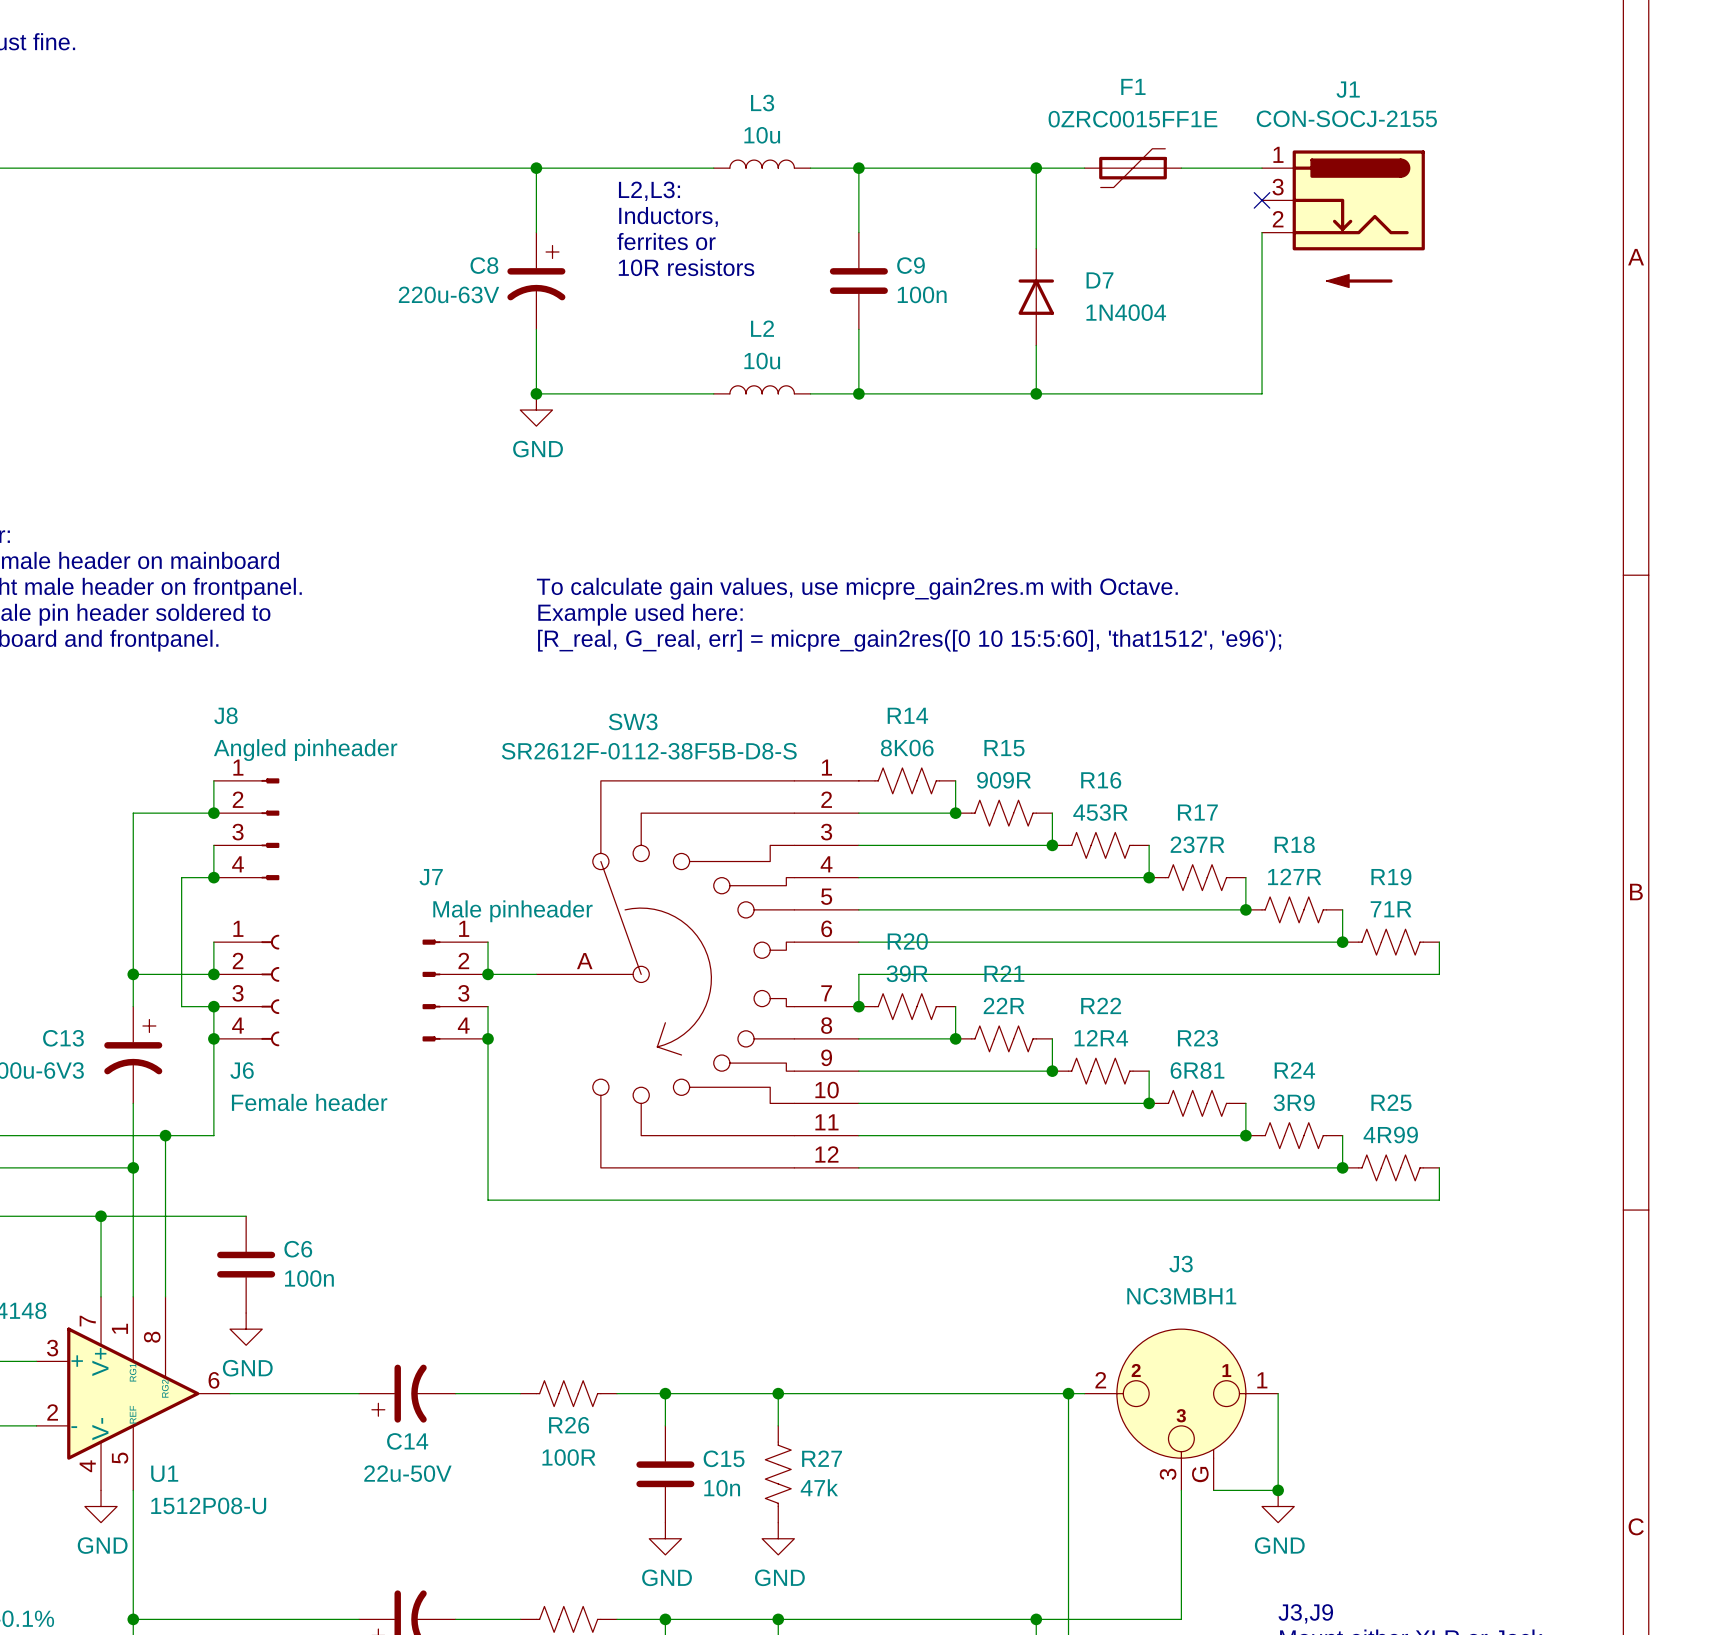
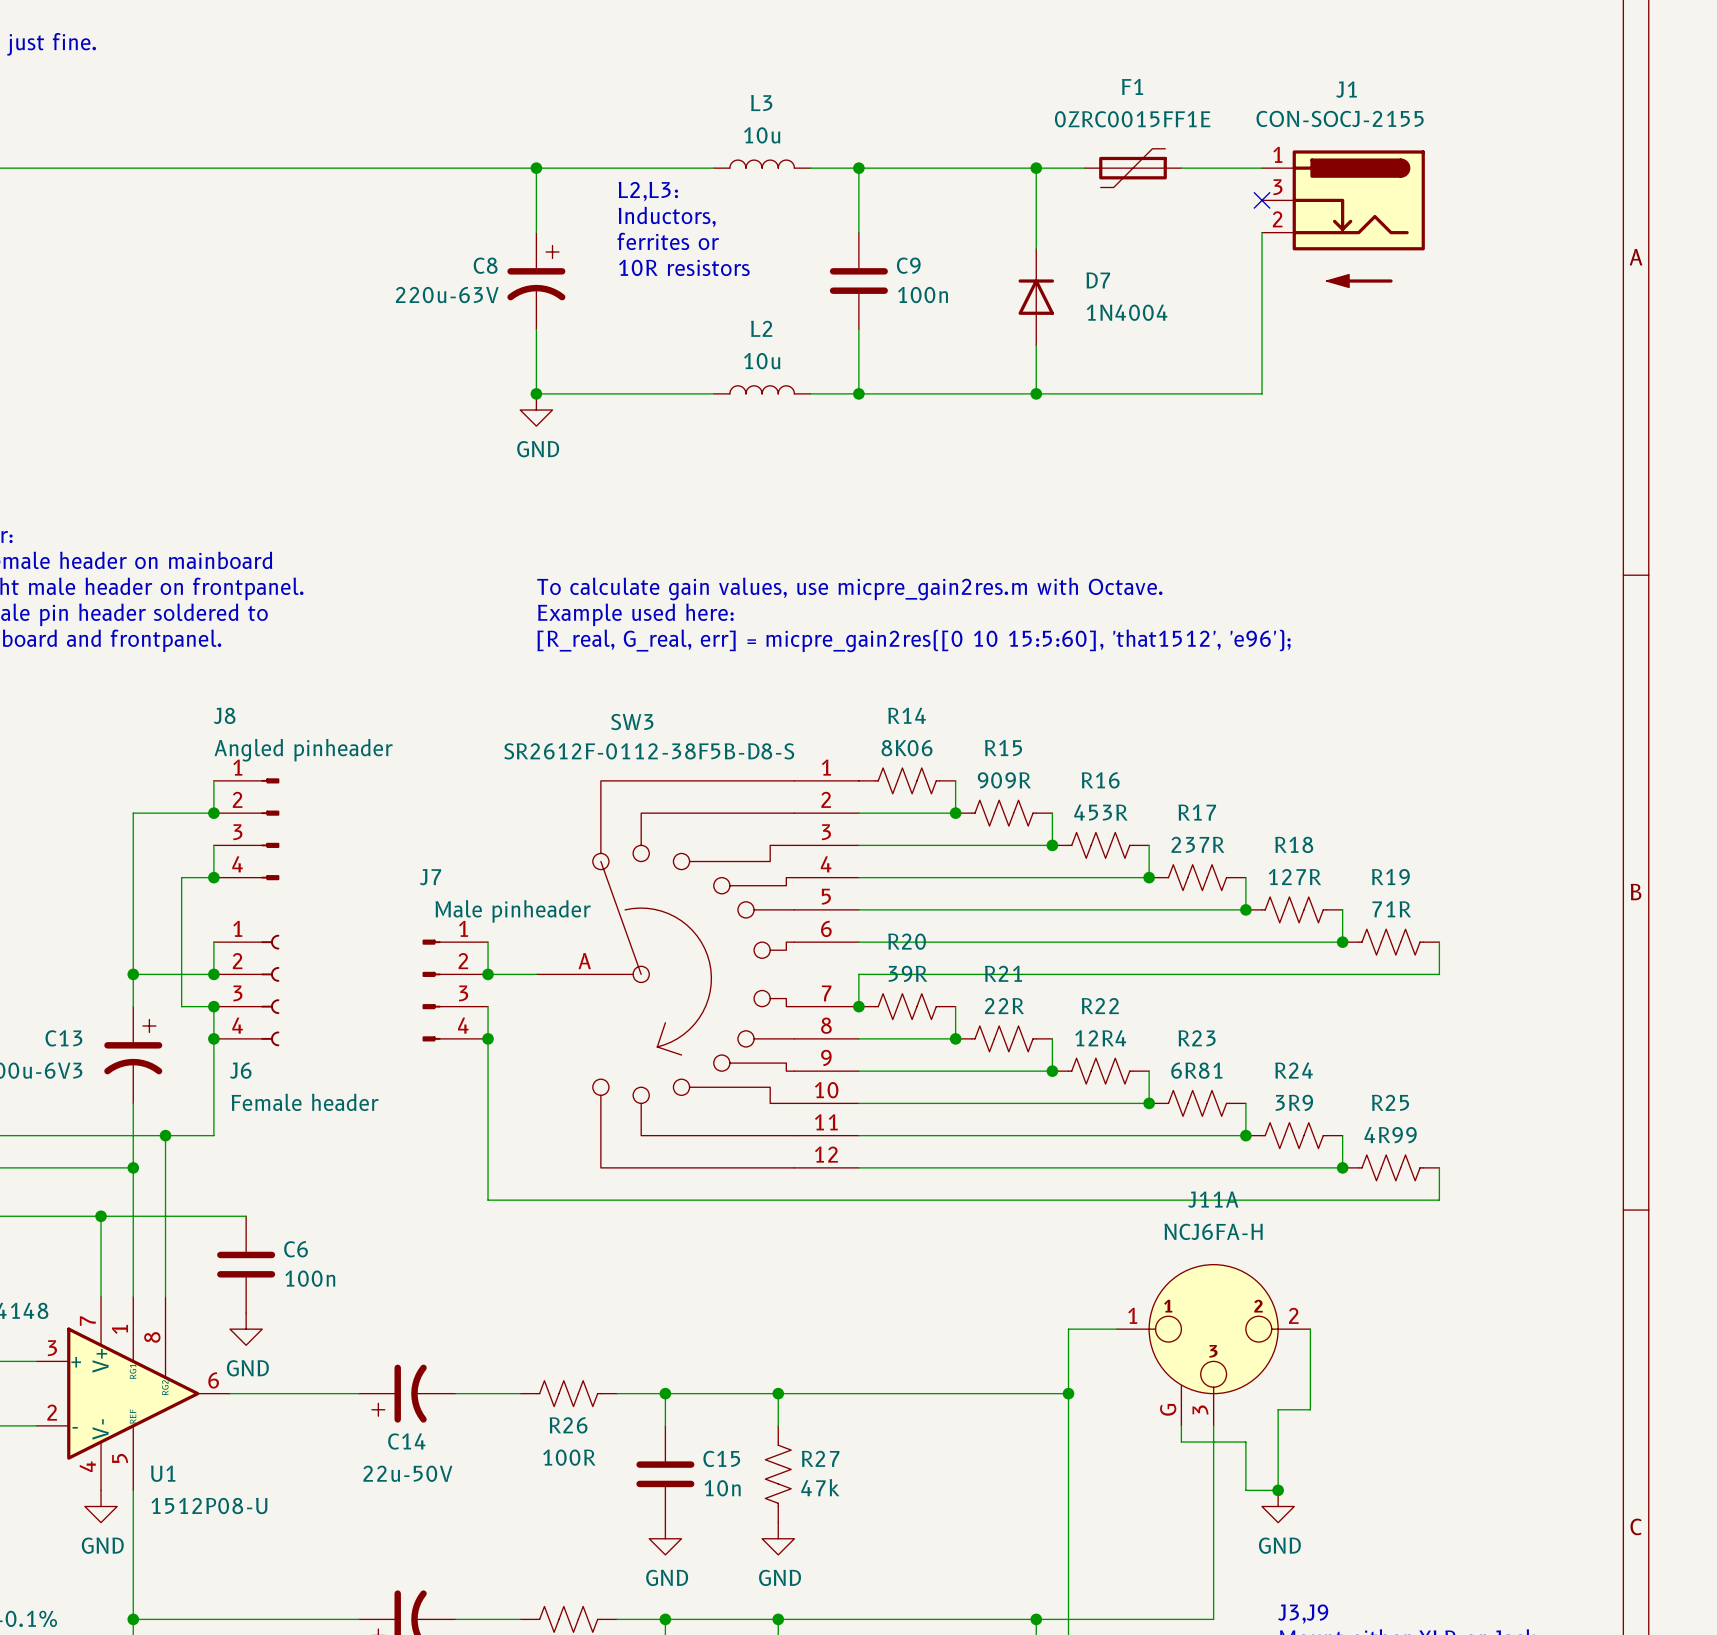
J11A: none -> NCJ6FA-H (1213, 1345)
wire: (1068, 1393) (1084, 1393) -> (1068, 1393) (1068, 1329) (1116, 1329)
wire: (1278, 1393) (1278, 1409) -> (1310, 1329) (1310, 1409) (1278, 1409)
J3: NC3MBH1 (1181, 1409) -> none
wire: (1181, 1490) (1181, 1619) -> (1213, 1425) (1213, 1619) (1181, 1619)
wire: (1213, 1490) (1245, 1490) -> (1181, 1425) (1181, 1442) (1245, 1442) (1245, 1490)

